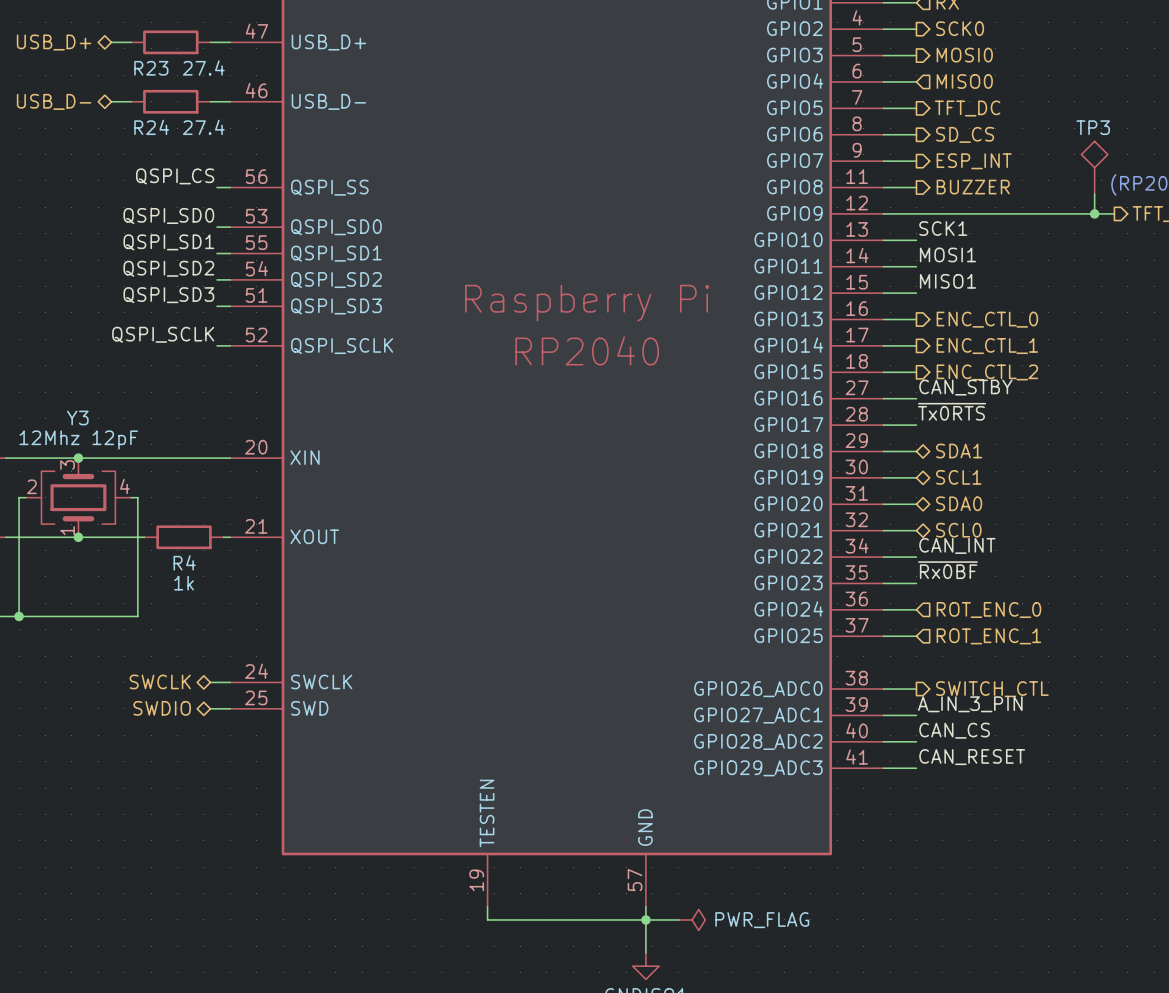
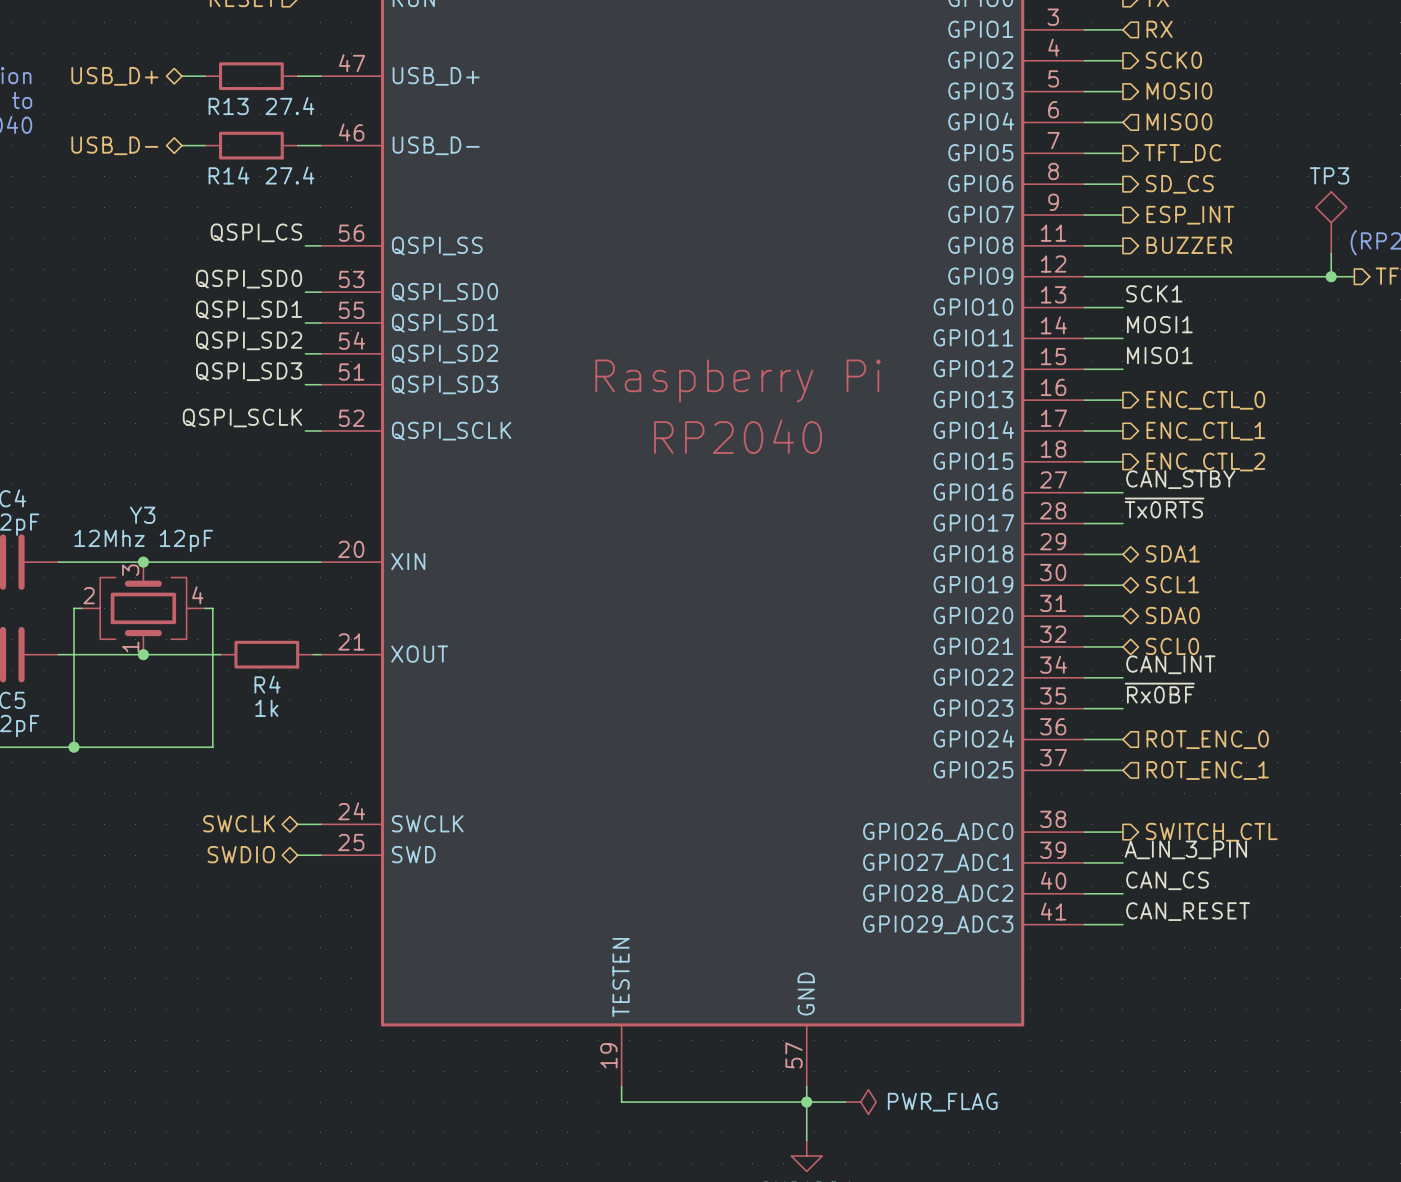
R23 name: R23 (151, 68) -> R13 (228, 106)
R24 name: R24 (151, 127) -> R14 (228, 175)

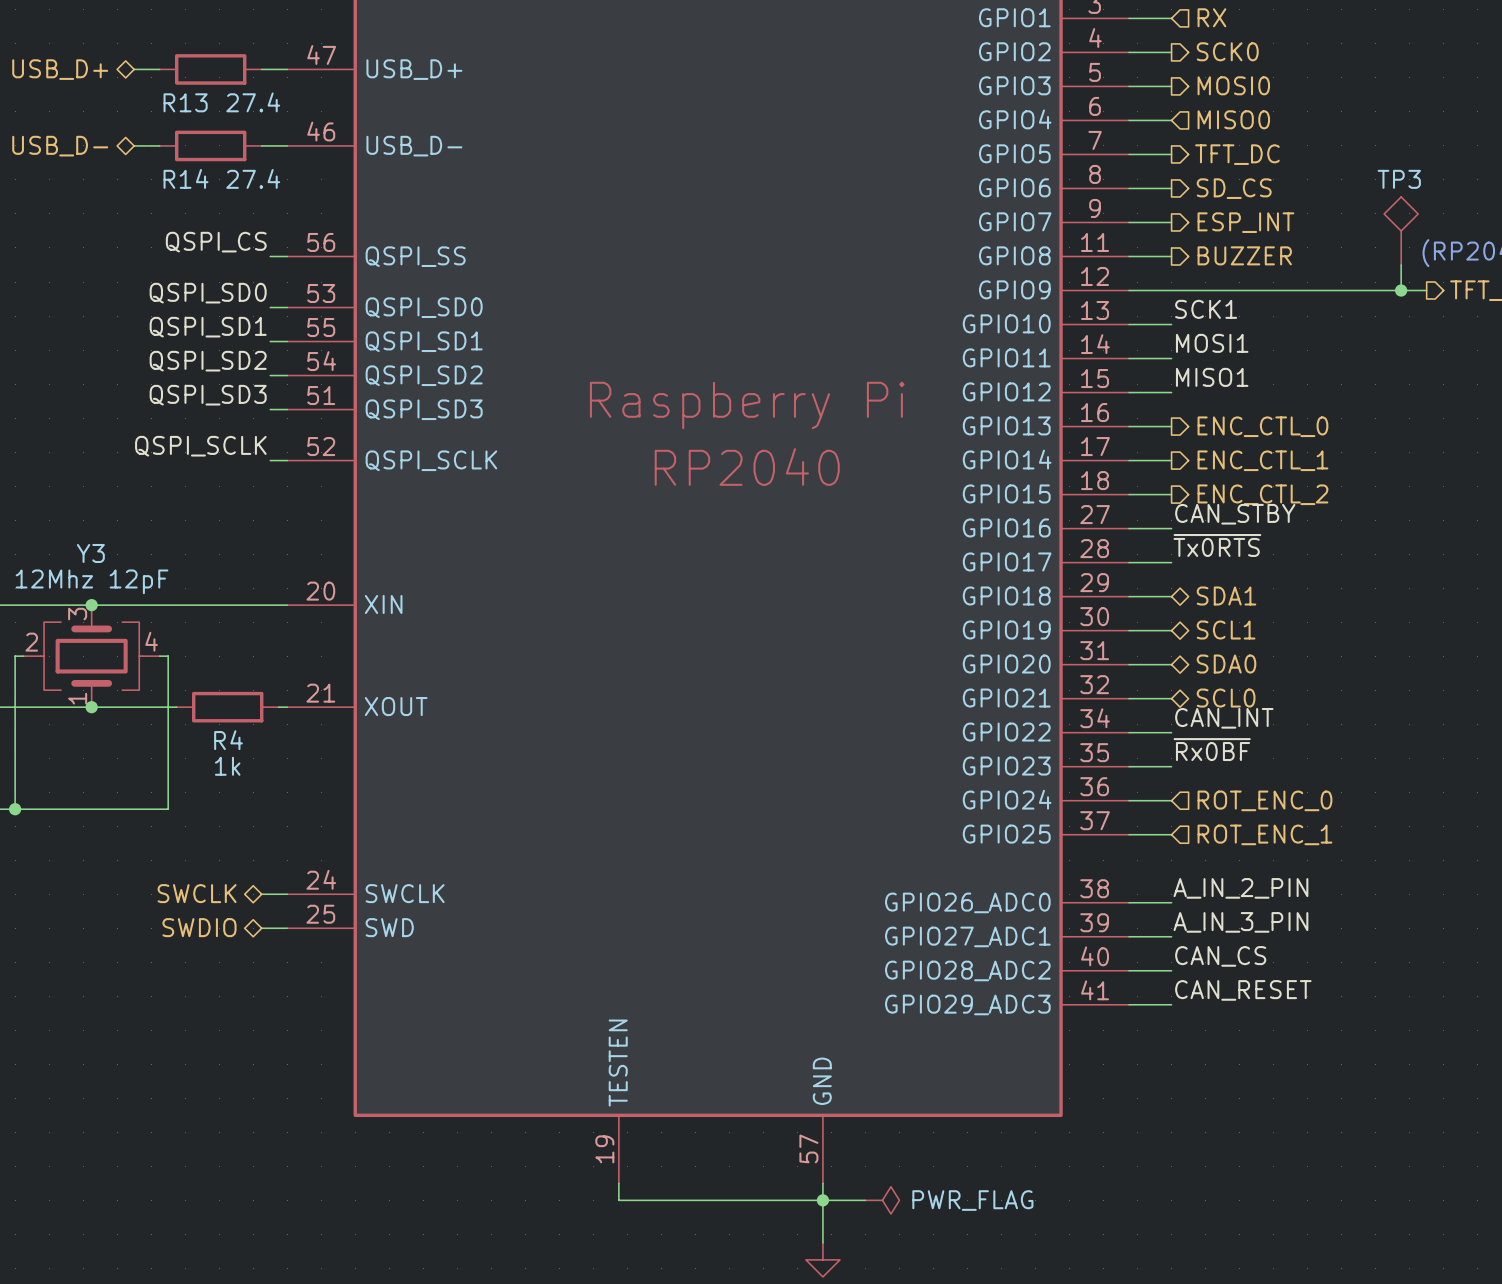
label: none -> A_IN_2_PIN (1240, 888)
hierarchical label: SWITCH_CTL (1211, 832) -> none

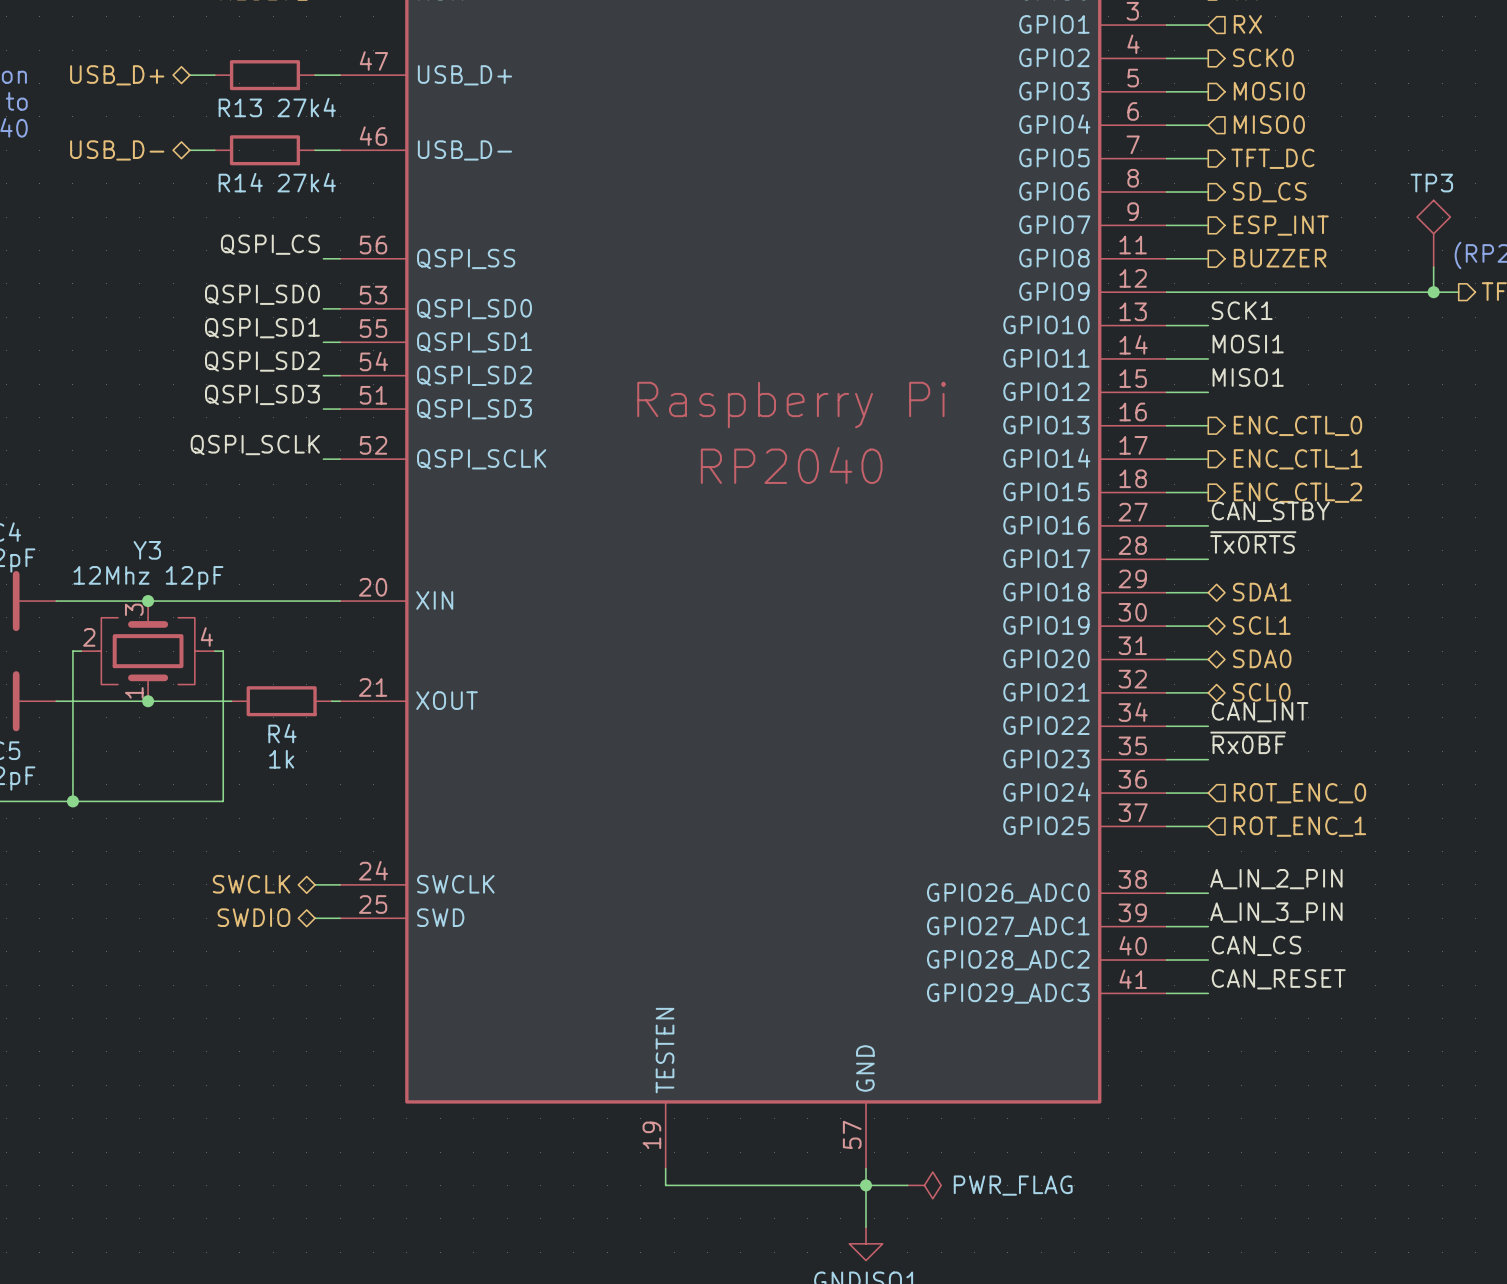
R13 value: 27.4 (253, 102) -> 27k4 (306, 107)
R14 value: 27.4 (253, 178) -> 27k4 (306, 182)

